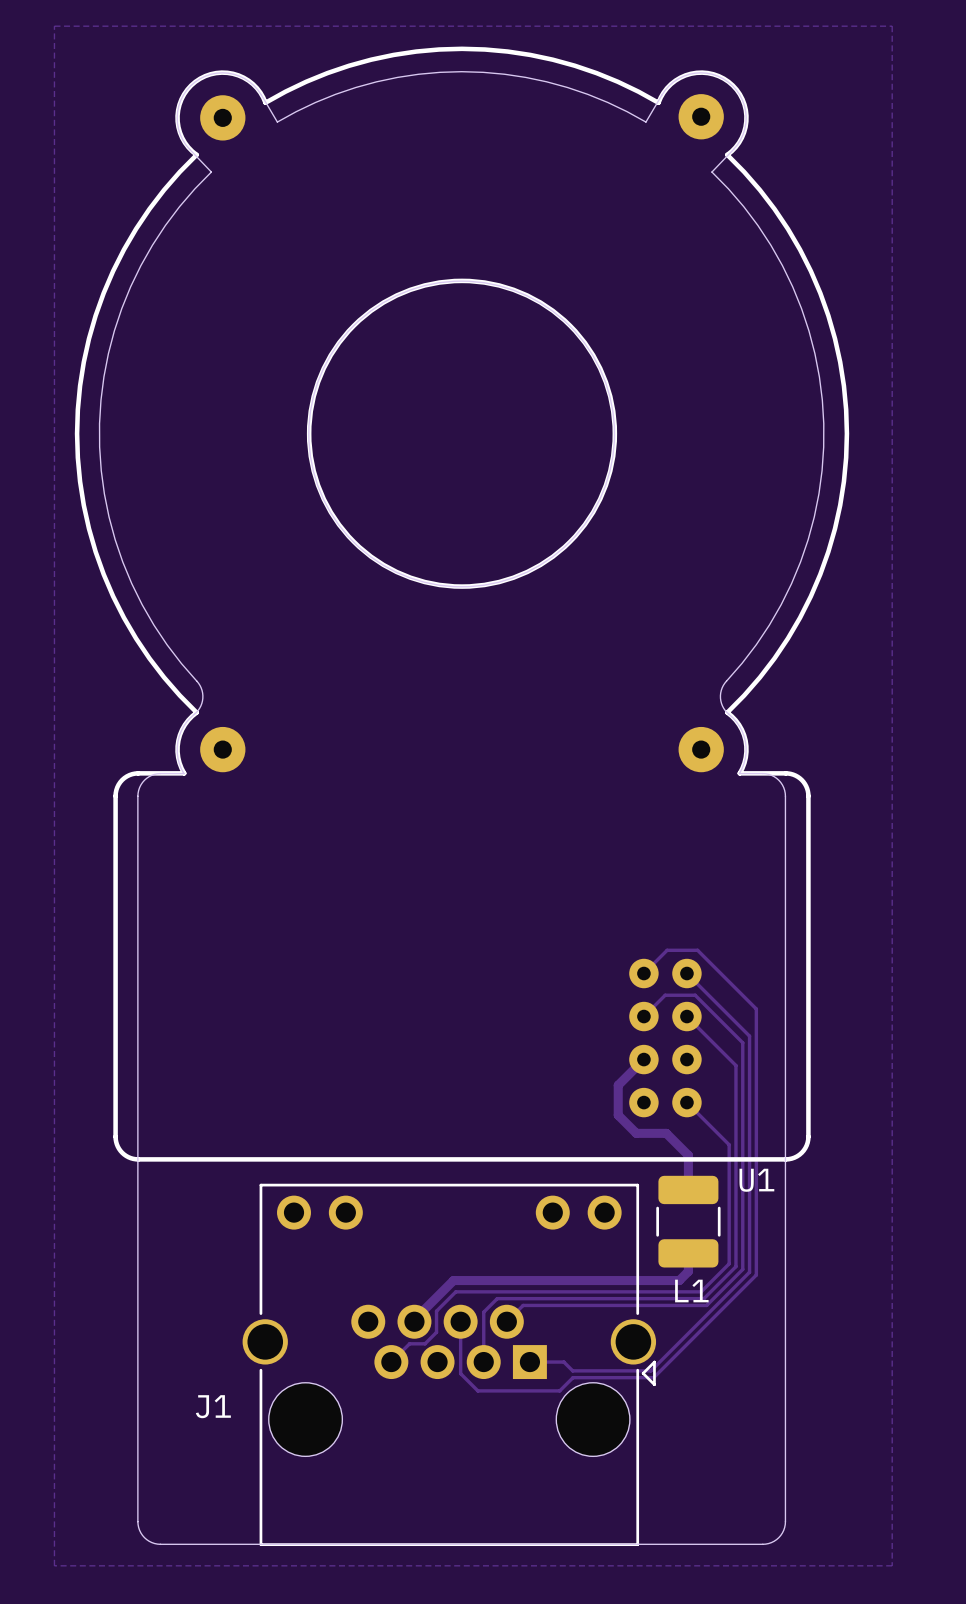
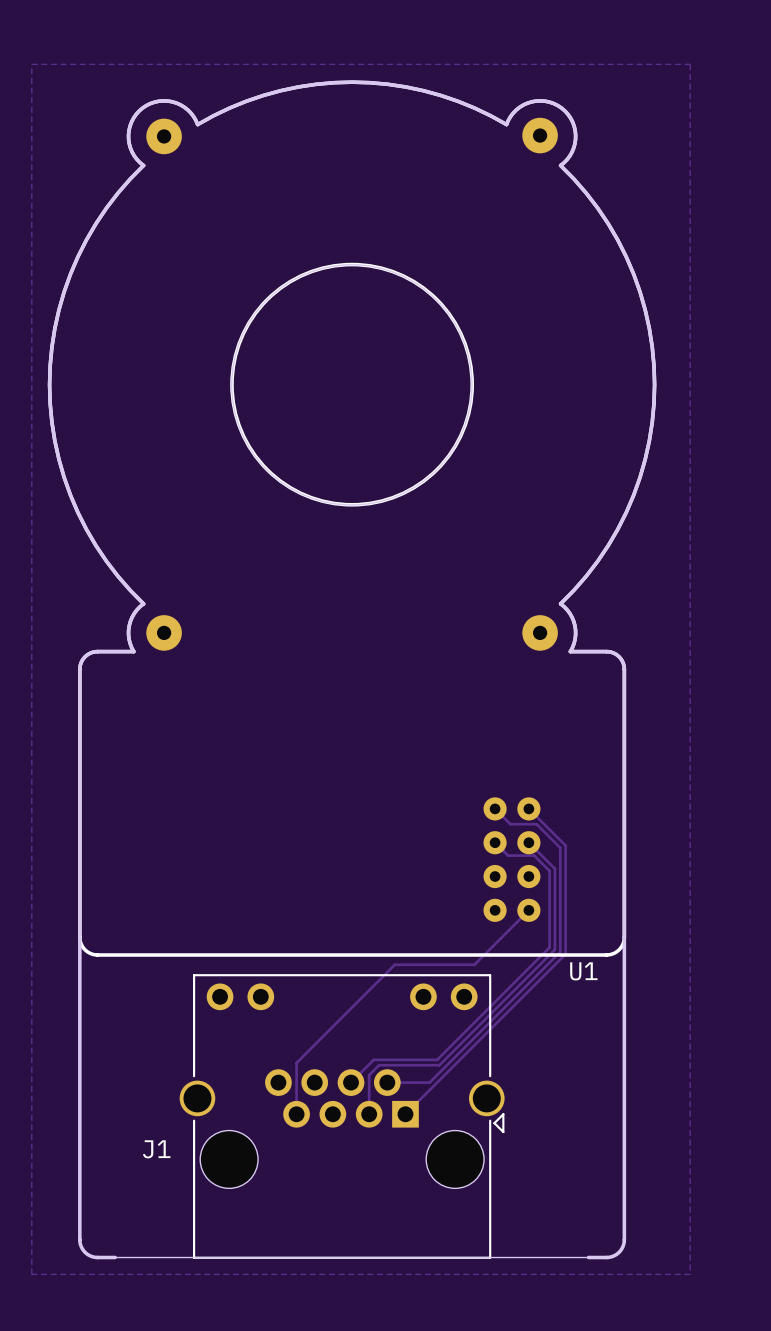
track: (643, 973) (667, 950) (697, 950) (756, 1009) (756, 1275) (653, 1377) (572, 1377) (559, 1390) (477, 1390) (460, 1373) (460, 1321) -> (495, 842) (507, 855) (534, 855) (549, 870) (549, 947) (437, 1059) (373, 1059) (351, 1082)
track: (643, 1016) (665, 995) (695, 995) (742, 1042) (742, 1269) (706, 1305) (523, 1305) (506, 1321) -> (495, 808) (510, 824) (536, 824) (560, 847) (560, 951) (429, 1082) (387, 1082)
track: (733, 1020) (749, 1036) (749, 1272) (650, 1370) (572, 1370) (563, 1362) (529, 1362) -> (565, 845) (565, 954) (405, 1114)
track: (720, 1049) (735, 1065) (735, 1266) (703, 1298) (496, 1299) -> (554, 868) (554, 949) (439, 1065) (379, 1065)
track: (643, 1059) (618, 1085) (618, 1115) (636, 1133) (666, 1133) (688, 1155) (688, 1189) -> none
track: (686, 1102) (729, 1144) (729, 1263) (701, 1291) (455, 1291) (436, 1311) (436, 1332) (425, 1343) (409, 1343) (391, 1362) -> (528, 910) (474, 964) (394, 964) (296, 1063) (296, 1114)
L1: (688, 1221) -> none
track: (688, 1253) (688, 1271) (679, 1280) (453, 1280) (414, 1321) -> none
board edge: (160, 1544) (151, 1542) (144, 1537) (139, 1530) (137, 1521) (137, 796) (142, 782) (151, 775) (183, 773) (177, 758) (179, 736) (186, 722) (199, 708) (202, 695) (198, 683) (167, 644) (142, 604) (122, 561) (115, 539) (104, 493) (99, 447) (100, 400) (108, 353) (121, 308) (140, 265) (165, 225) (179, 206) (211, 172) (185, 144) (180, 134) (177, 123) (177, 111) (180, 100) (186, 90) (195, 82) (205, 76) (216, 73) (228, 73) (239, 76) (249, 82) (258, 90) (277, 122) (315, 102) (355, 87) (418, 74) (461, 71) (504, 74) (546, 81) (587, 94) (645, 122) (665, 90) (673, 82) (683, 76) (695, 73) (706, 73) (718, 76) (728, 82) (736, 90) (742, 100) (745, 111) (745, 123) (743, 134) (737, 144) (711, 172) (743, 206) (757, 225) (782, 265) (801, 308) (814, 353) (822, 400) (823, 447) (818, 493) (808, 539) (791, 583) (781, 604) (756, 644) (724, 683) (720, 695) (723, 708) (736, 722) (744, 736) (745, 758) (739, 773) (771, 775) (782, 784) (785, 796) (785, 1521) (783, 1530) (778, 1537) (771, 1542) (762, 1544) -> (115, 1257) (89, 1255) (82, 1249) (79, 1241) (79, 669) (83, 658) (93, 652) (133, 651) (129, 639) (129, 625) (134, 613) (143, 603) (117, 576) (95, 545) (77, 512) (64, 477) (54, 440) (50, 403) (50, 365) (54, 328) (64, 291) (86, 240) (117, 193) (143, 165) (134, 155) (128, 139) (131, 121) (142, 108) (158, 101) (176, 103) (190, 113) (197, 124) (246, 101) (280, 90) (316, 84) (352, 82) (388, 84) (440, 95) (474, 108) (506, 124) (516, 109) (527, 103) (545, 101) (561, 108) (572, 121) (575, 139) (572, 152) (560, 165) (586, 193) (617, 240) (633, 274) (649, 328) (654, 365) (654, 403) (649, 440) (640, 477) (626, 512) (608, 545) (586, 576) (560, 603) (569, 613) (574, 625) (575, 639) (570, 651) (612, 652) (620, 658) (624, 669) (624, 1239) (621, 1248) (615, 1255) (608, 1257) (588, 1257)

